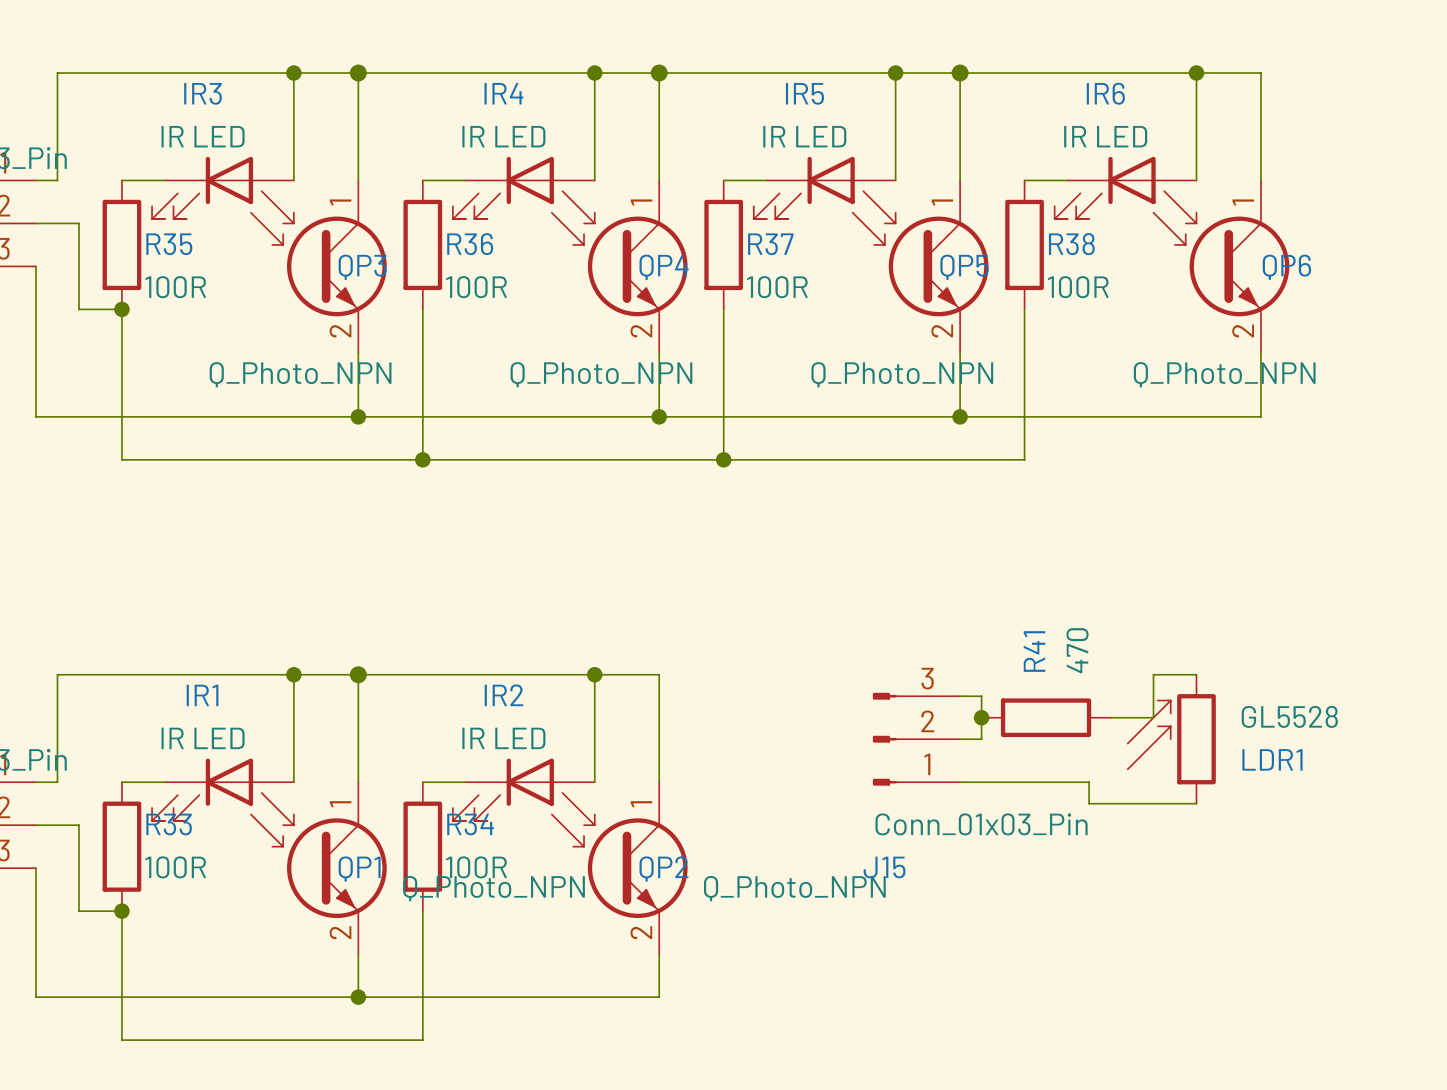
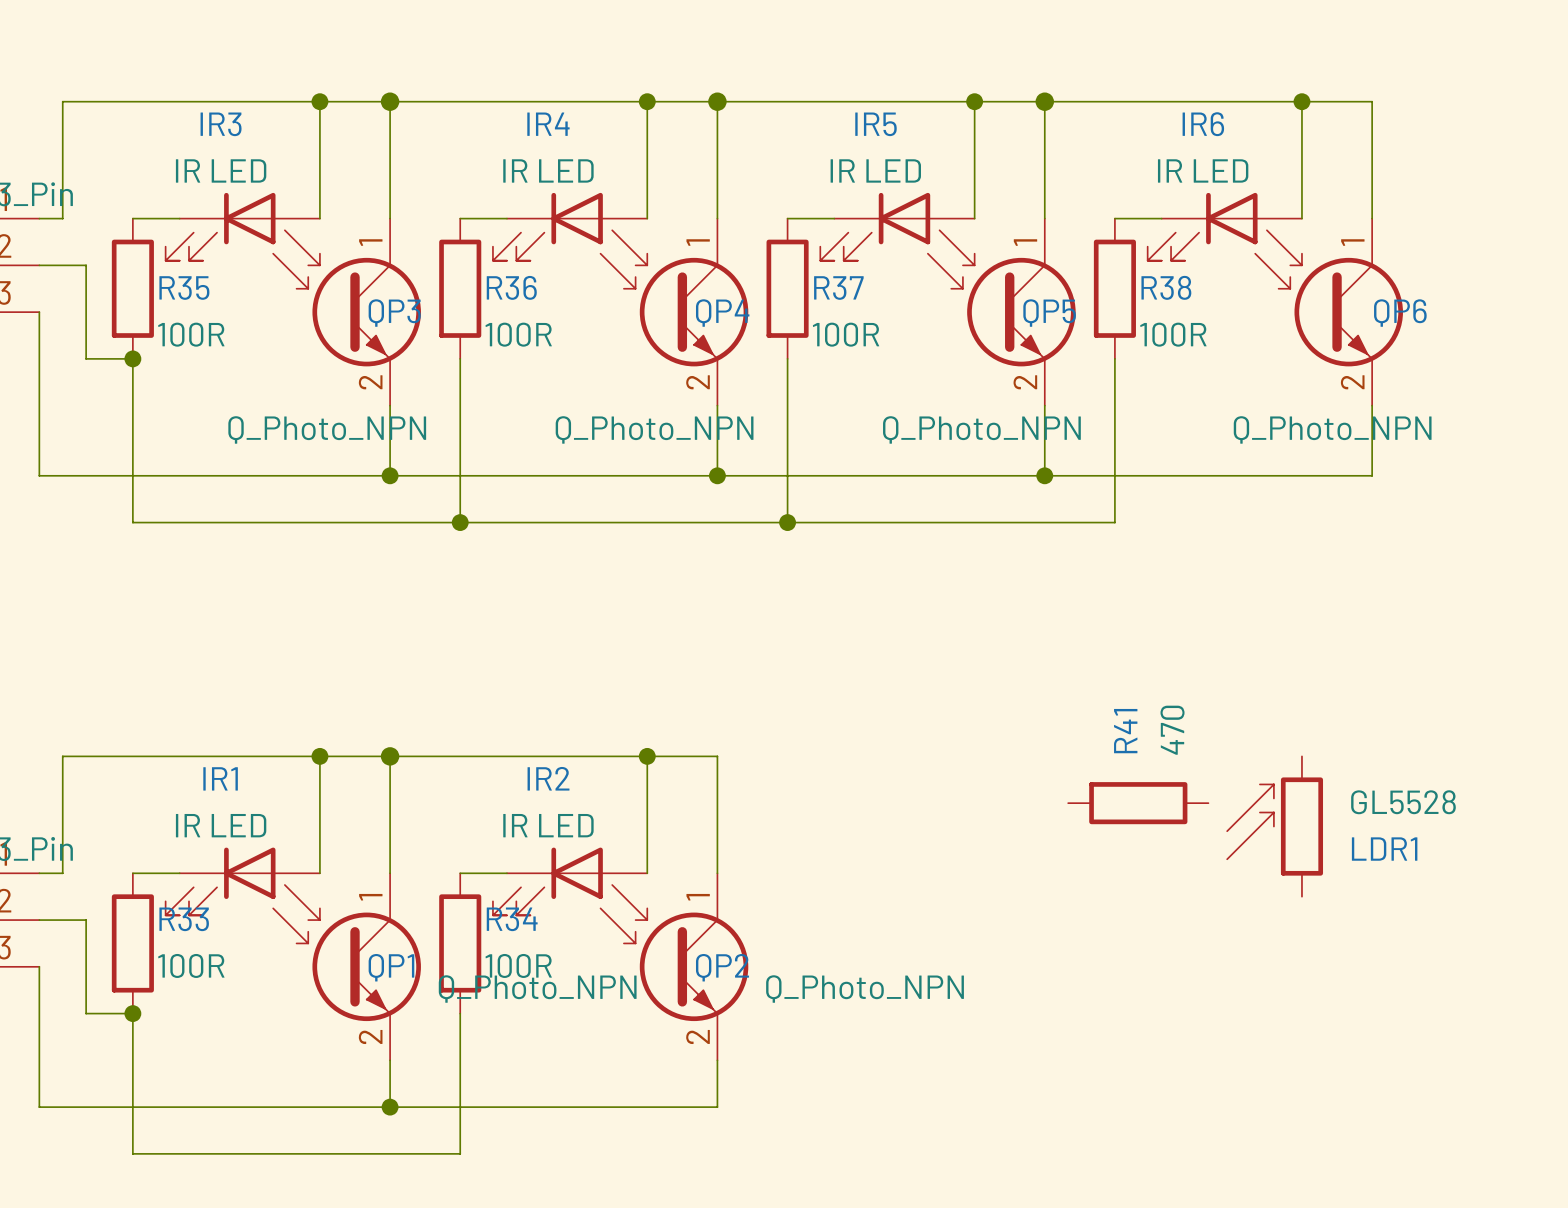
wire: (1196, 674) (1153, 674) (1153, 717) (1110, 717) -> none
wire: (960, 696) (981, 696) (981, 739) (960, 739) -> none
junction: (981, 717) -> none
J15: Conn_01x03_Pin (916, 739) -> none
wire: (960, 782) (1089, 782) (1089, 803) (1196, 803) -> none

